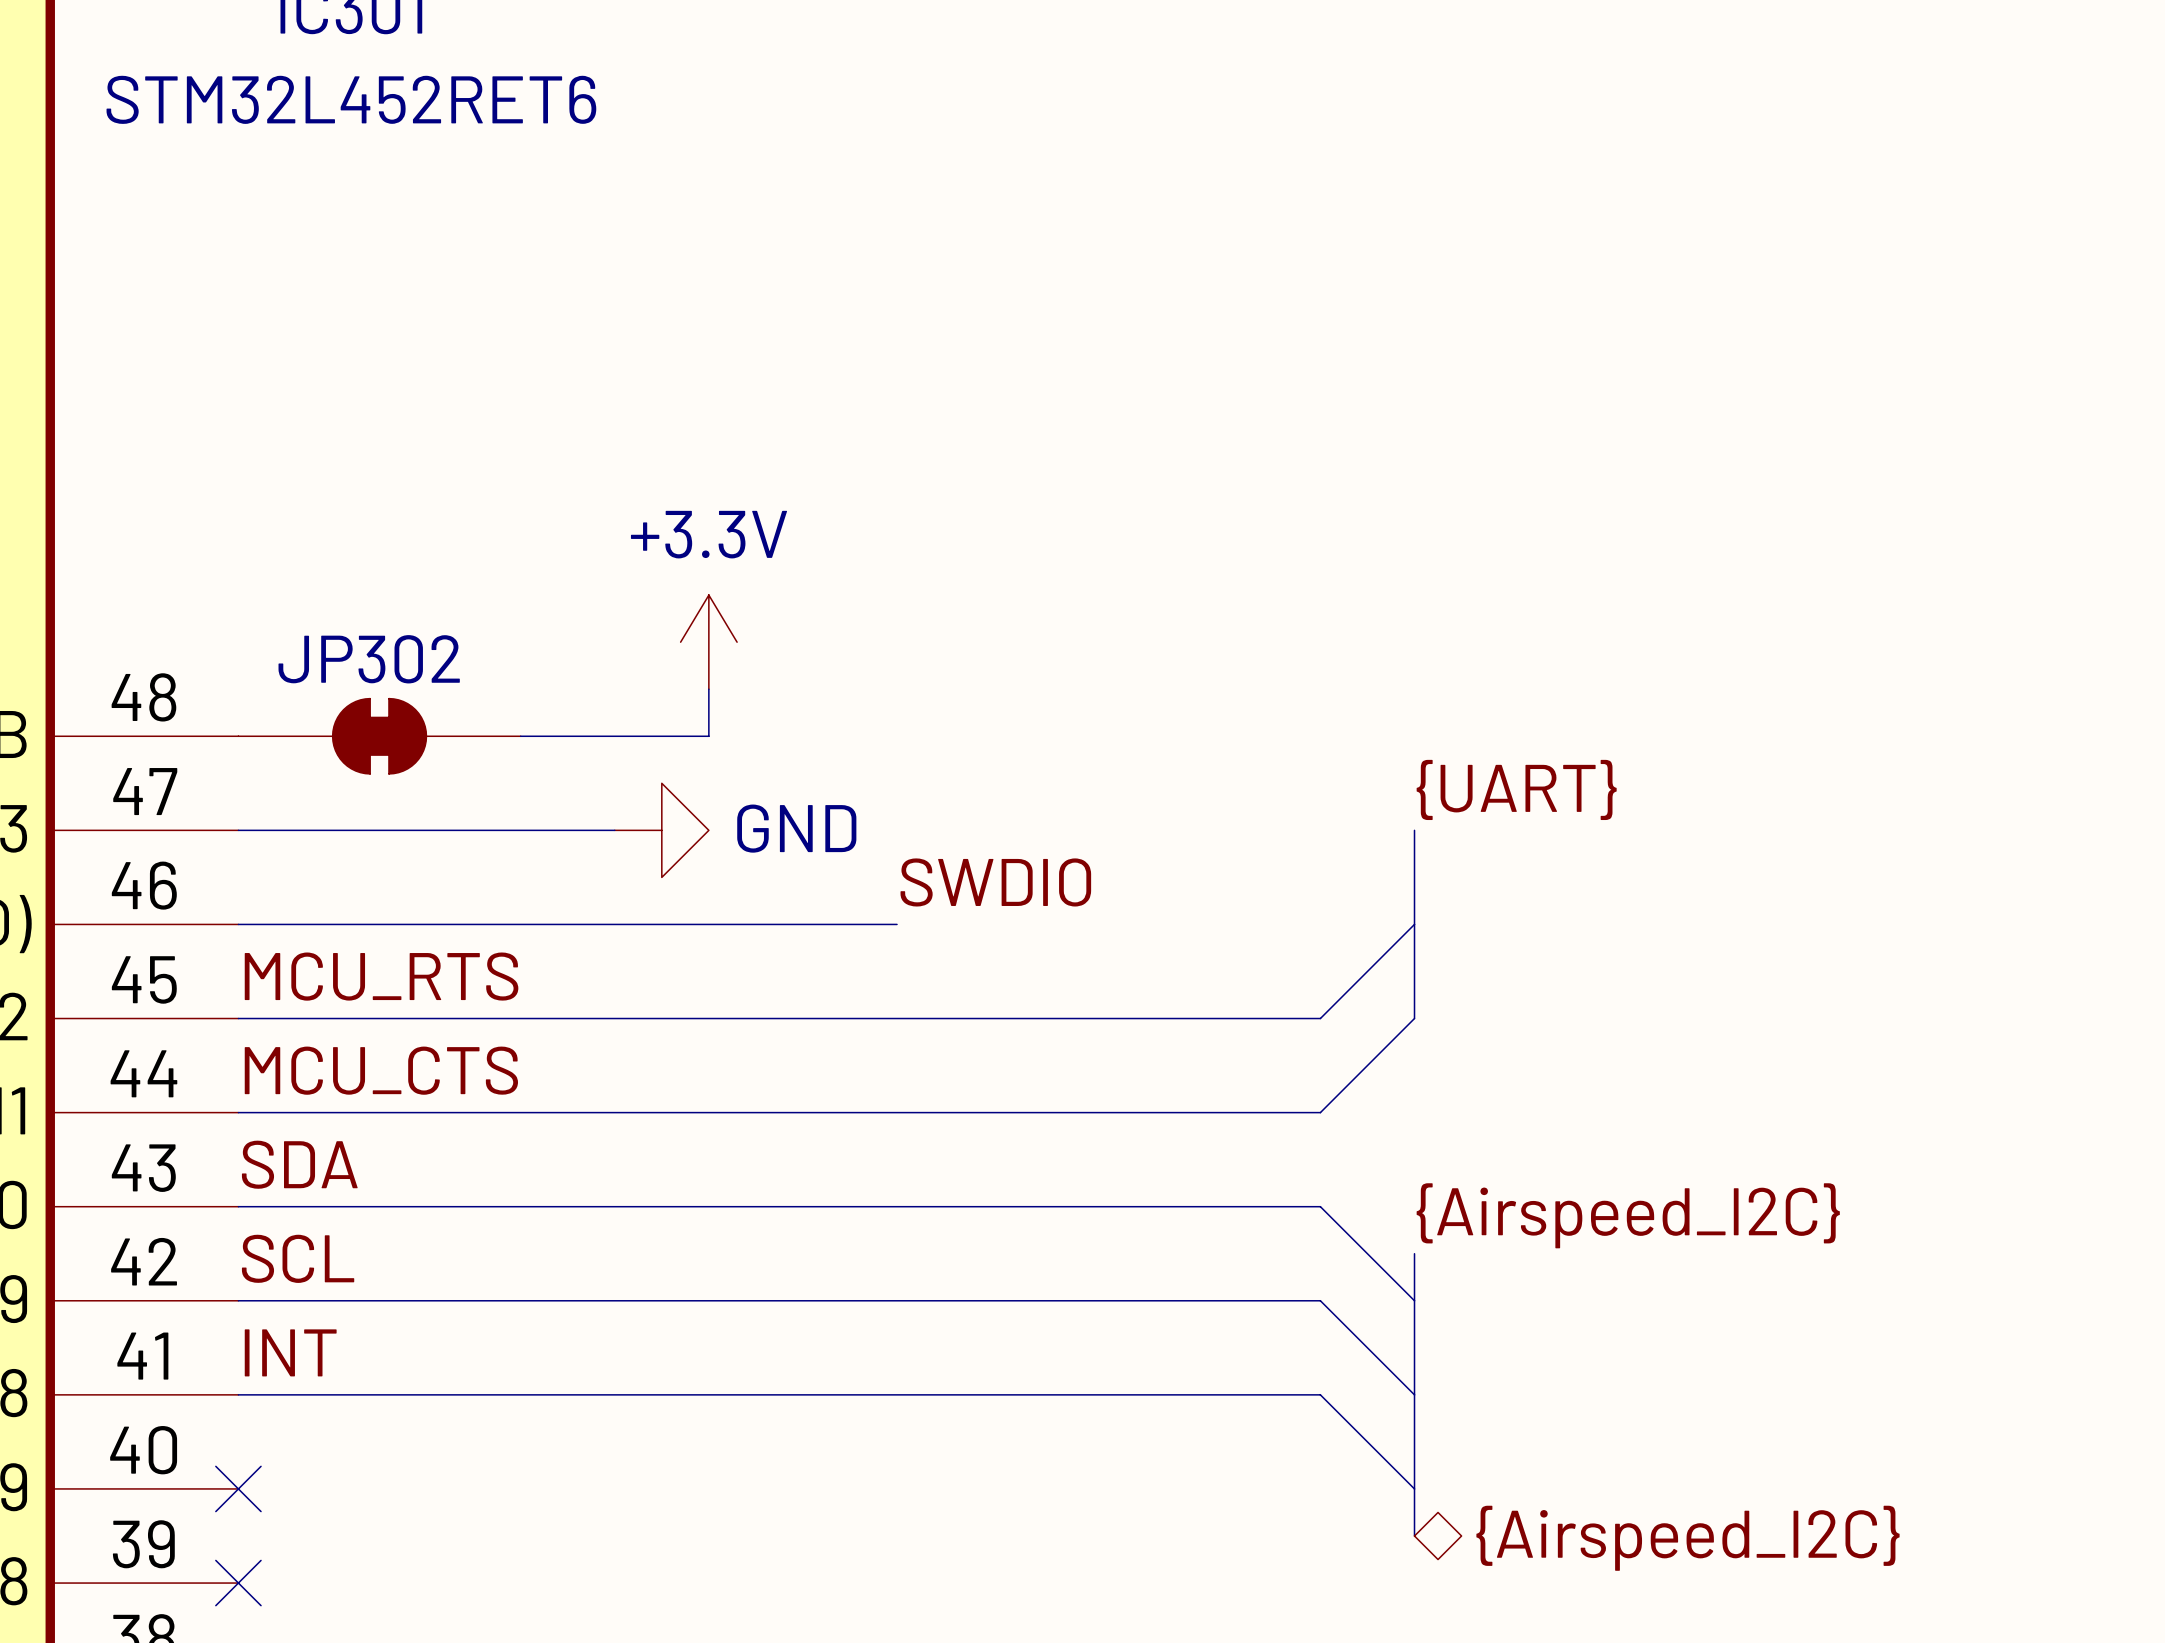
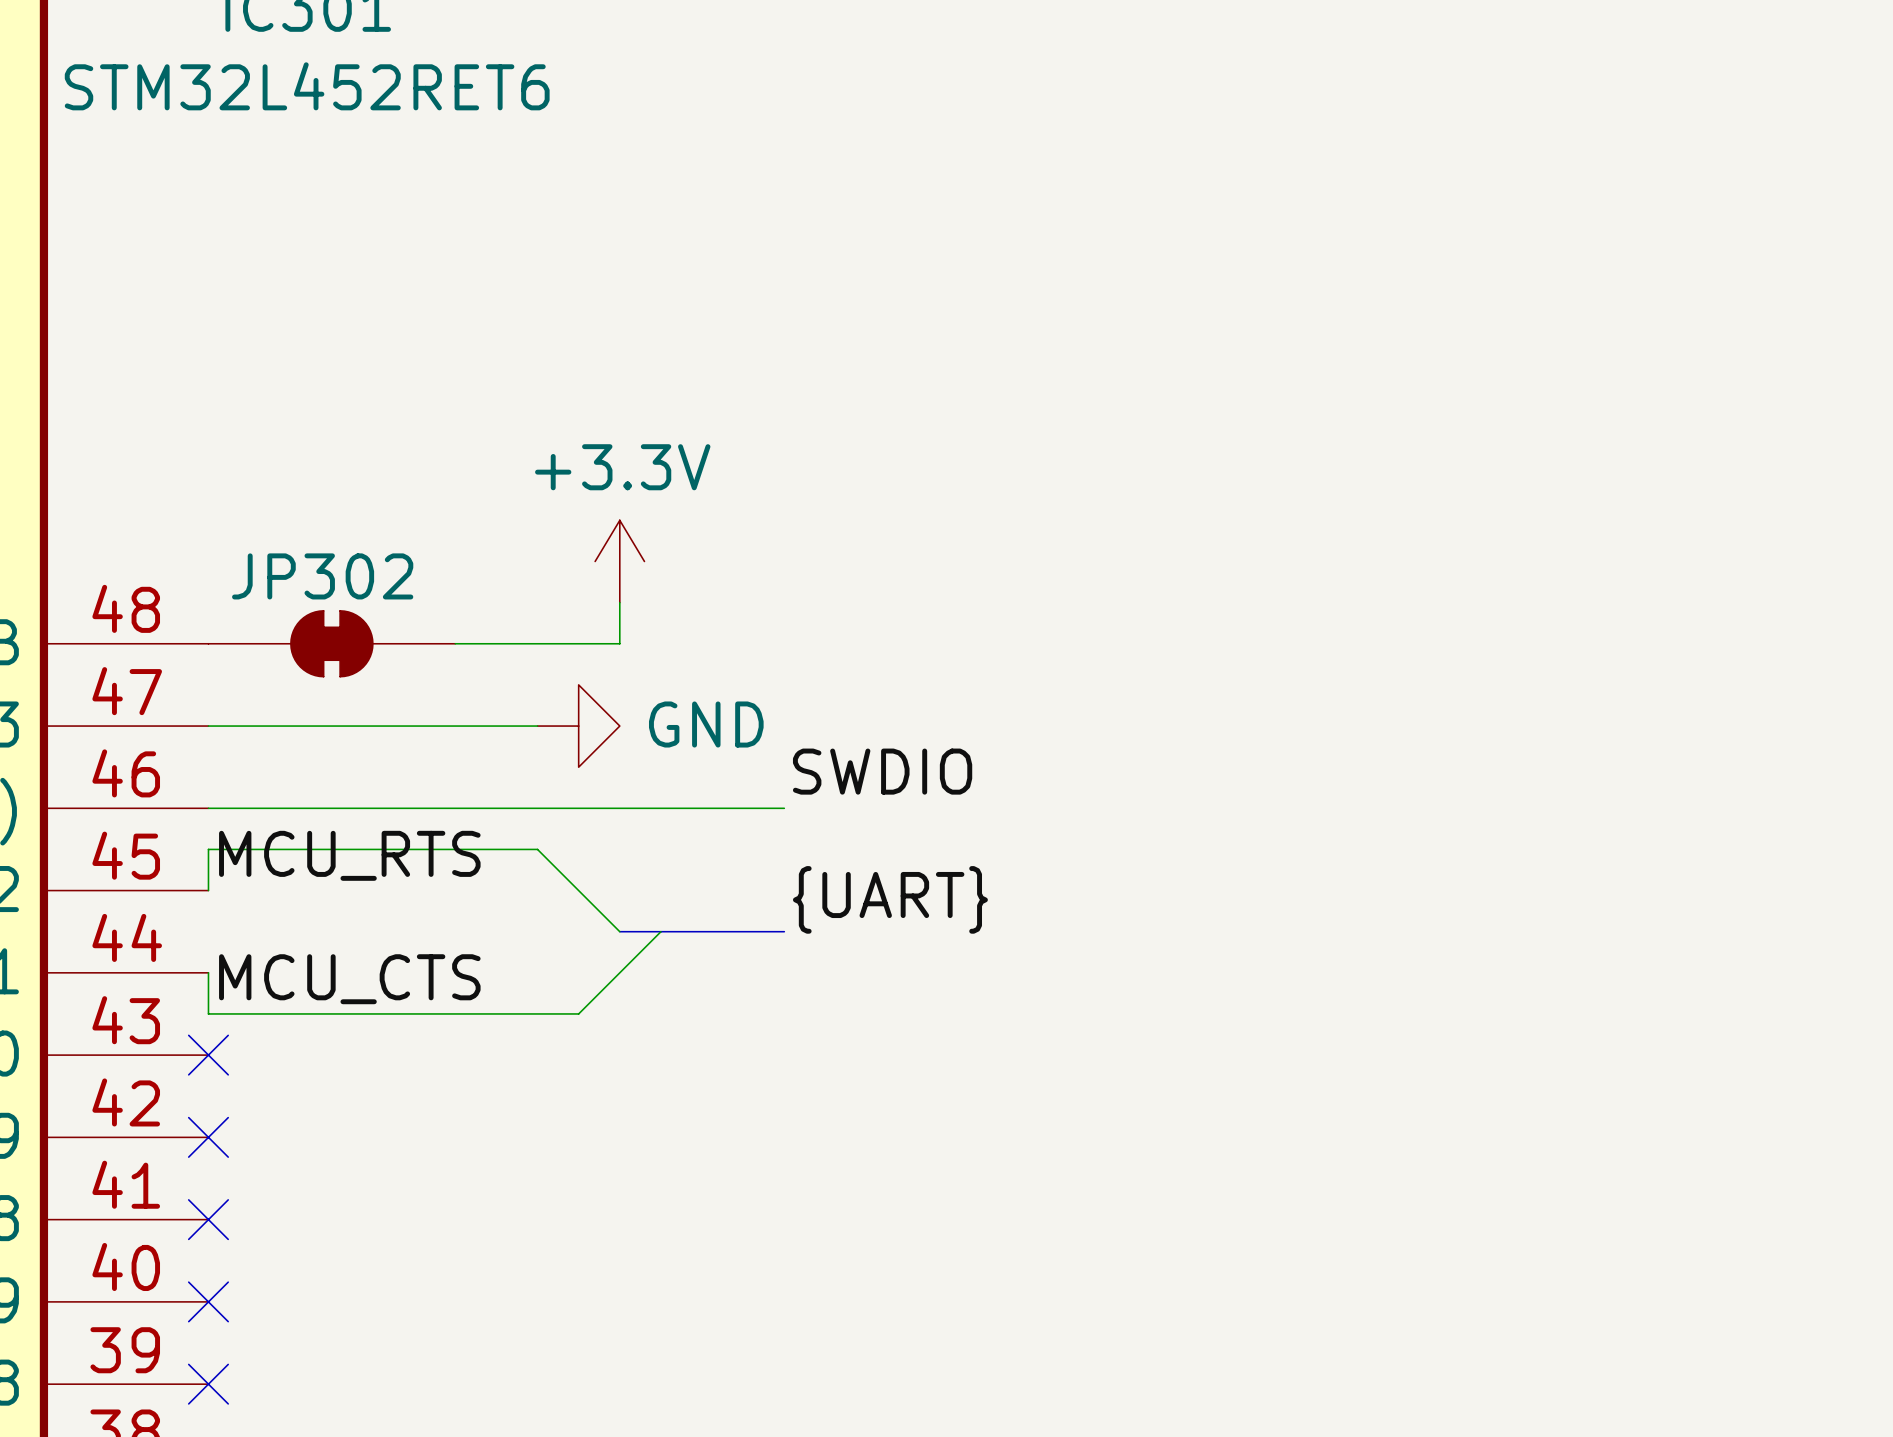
label position: {UART} (1516, 789) -> {UART} (890, 899)
bus: (1414, 830) (1414, 1018) -> none
wire: (1414, 924) (1320, 1018) (238, 1018) -> (619, 931) (537, 849) (208, 849) (208, 890)
wire: (1414, 1018) (1320, 1112) (238, 1112) -> (660, 931) (578, 1013) (208, 1013) (208, 972)
bus: none -> (619, 931) (784, 931)
label position: MCU_CTS (381, 1070) -> MCU_CTS (349, 979)
label: SDA (299, 1164) -> none
wire: (238, 1206) (1320, 1206) (1414, 1300) -> none
no-connect mark: none -> (208, 1055)
label: {Airspeed_I2C} (1628, 1215) -> none
bus: (1414, 1253) (1414, 1536) -> none
label: SCL (298, 1258) -> none
wire: (238, 1300) (1320, 1300) (1414, 1394) -> none
no-connect mark: none -> (208, 1137)
label: INT (290, 1352) -> none
wire: (238, 1394) (1320, 1394) (1414, 1488) -> none
no-connect mark: none -> (208, 1219)
hierarchical label: {Airspeed_I2C} (1687, 1538) -> none

